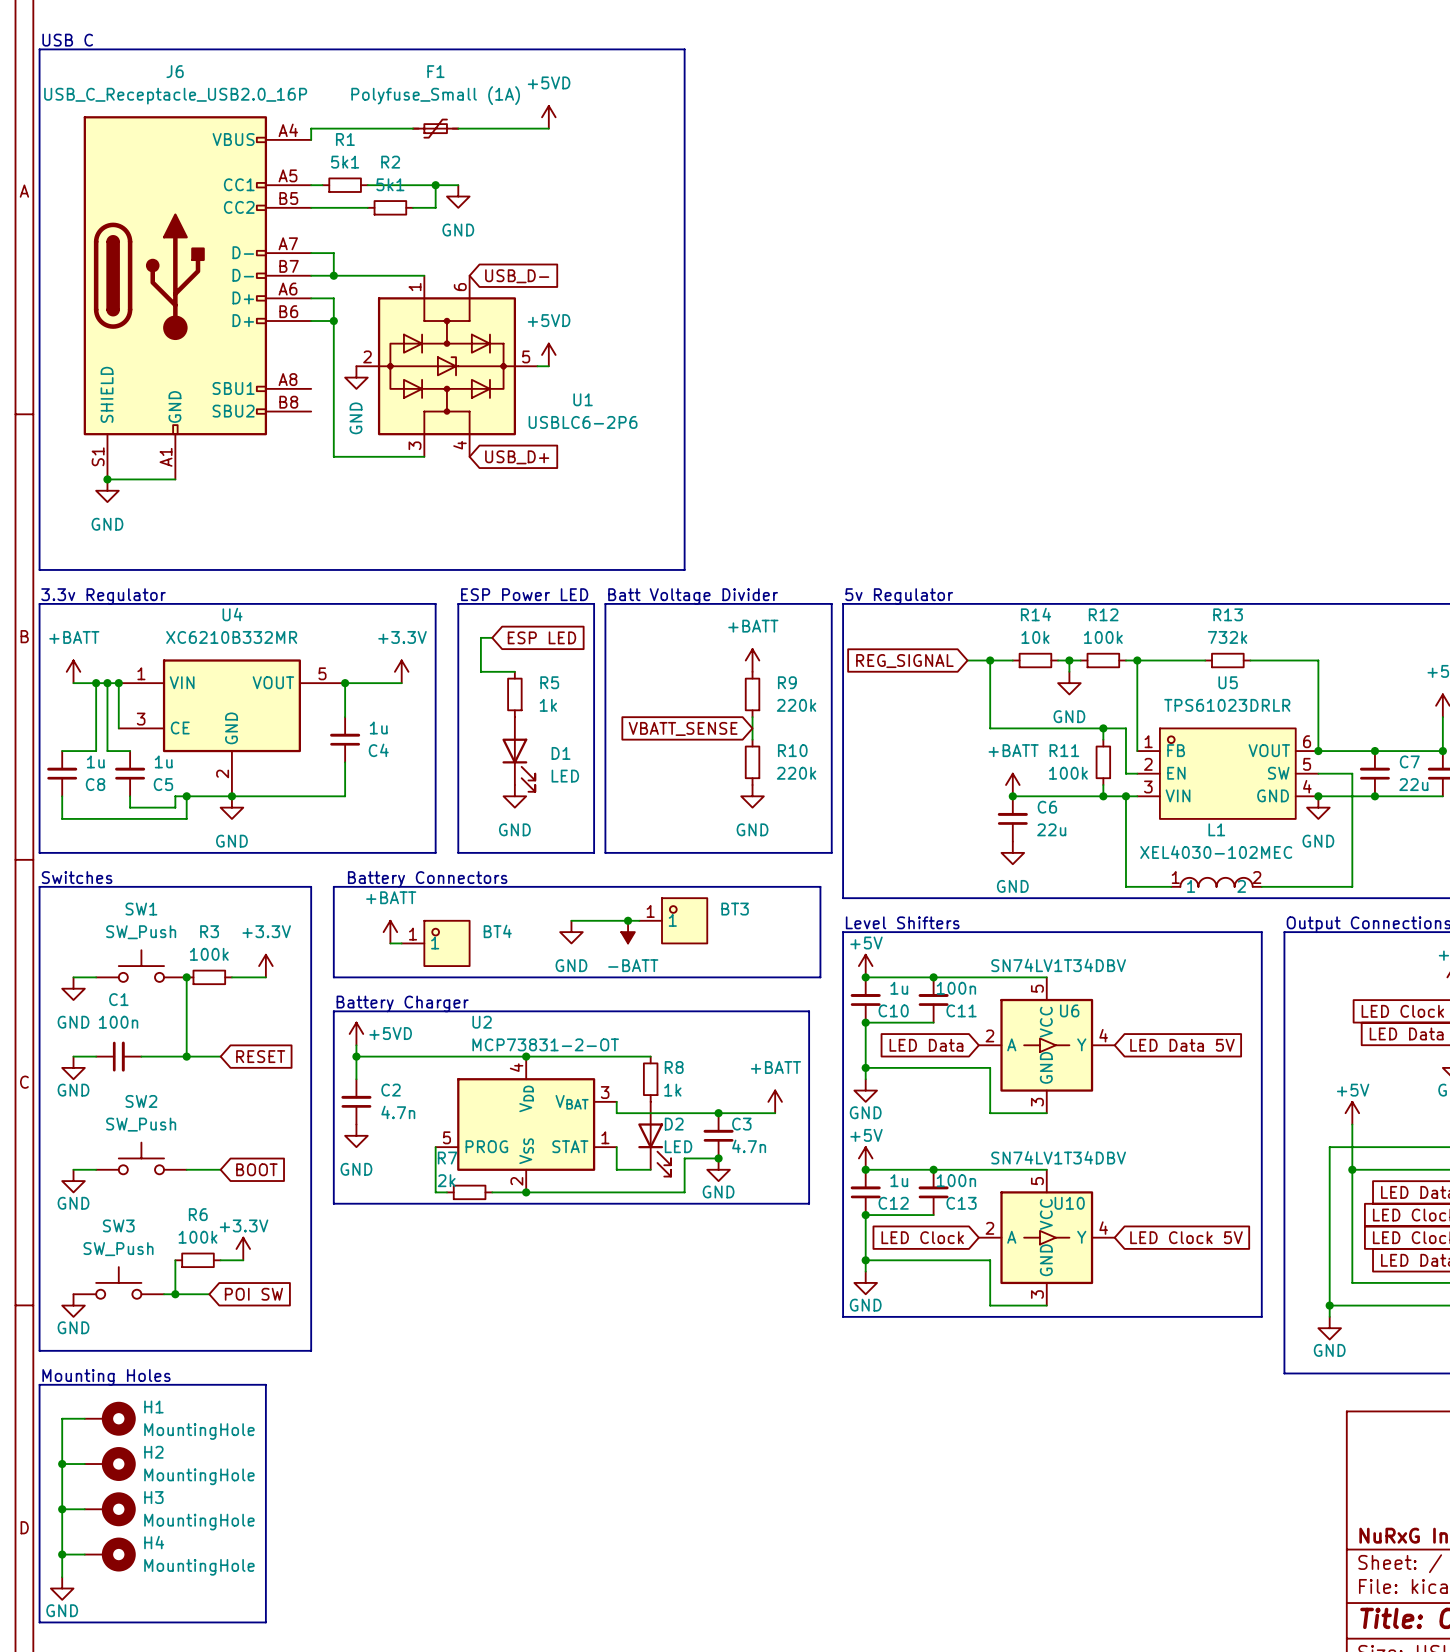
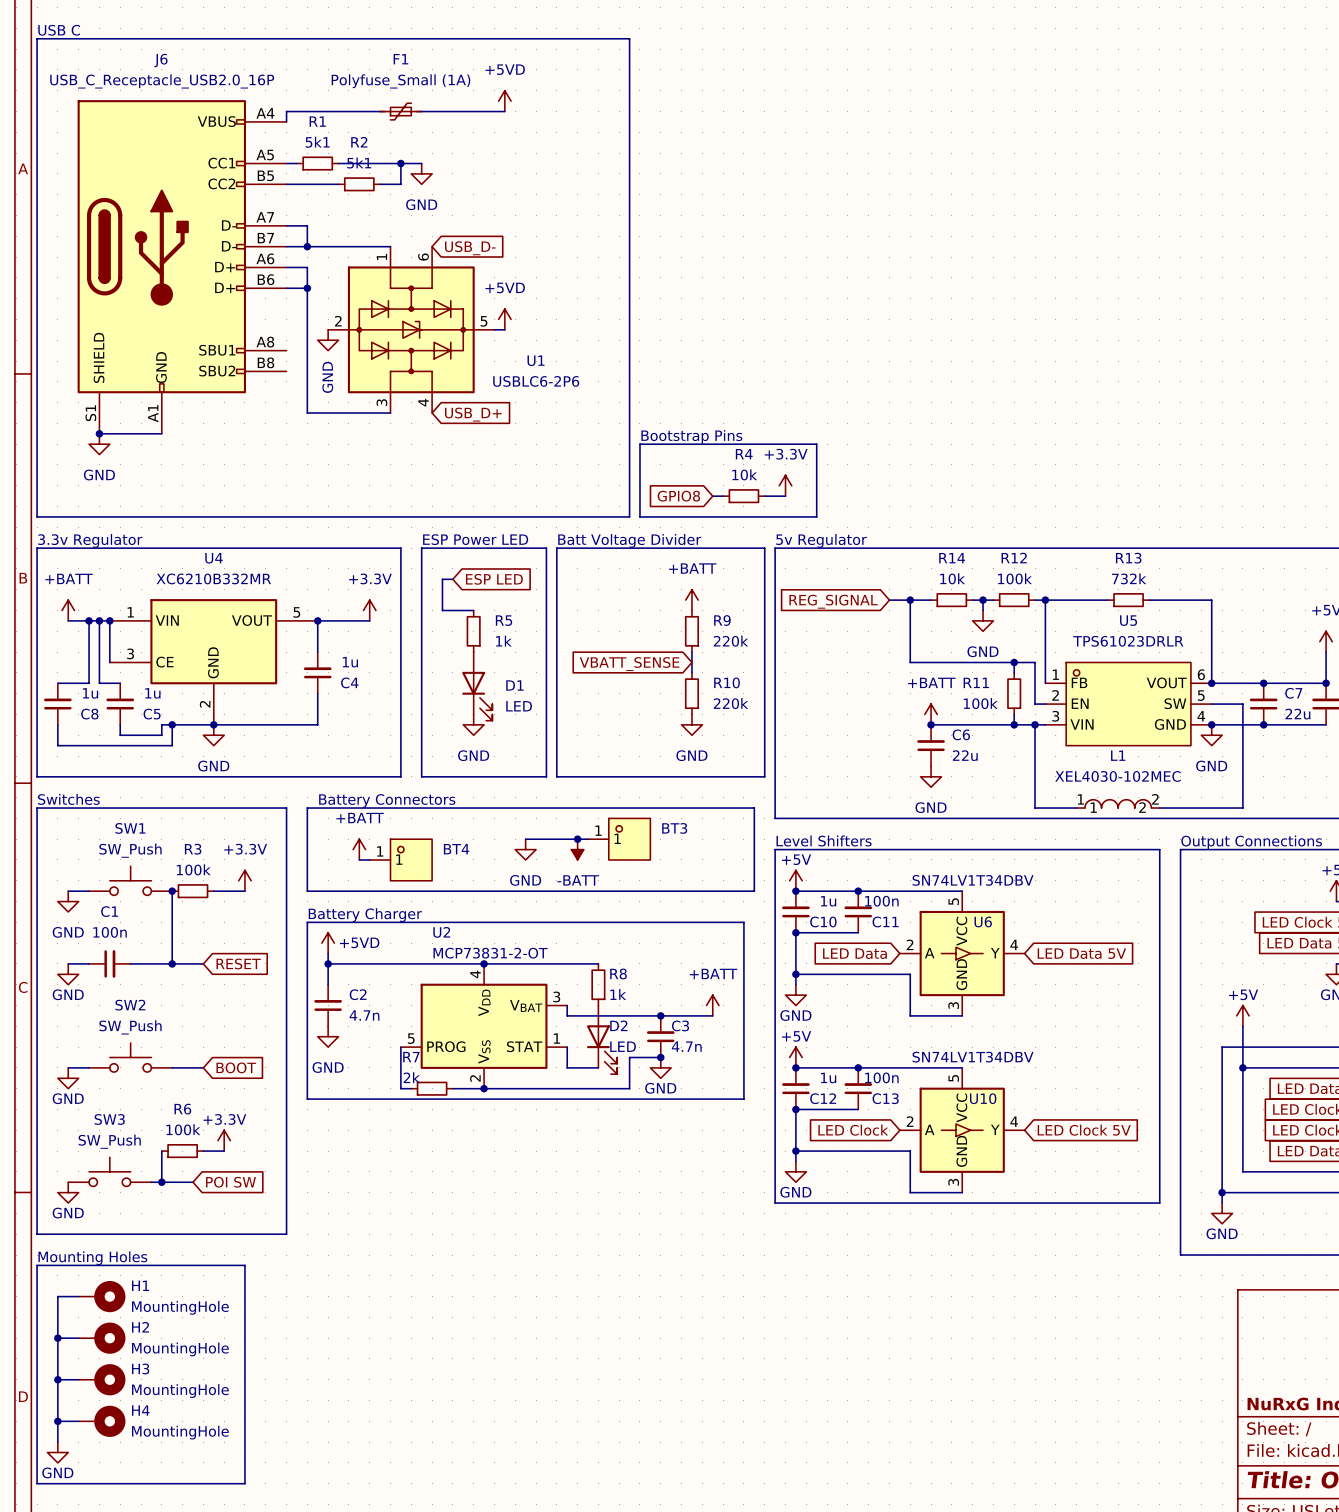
text: none -> Bootstrap Pins (691, 436)
line: none -> (639, 444) (816, 444) (816, 516) (639, 516) (639, 444)
power symbol: none -> +3.3V (785, 485)
global label: none -> GPIO8 (678, 496)
wire: none -> (712, 496) (723, 496)
R4: none -> 10k (743, 496)
wire: none -> (764, 496) (785, 496)

